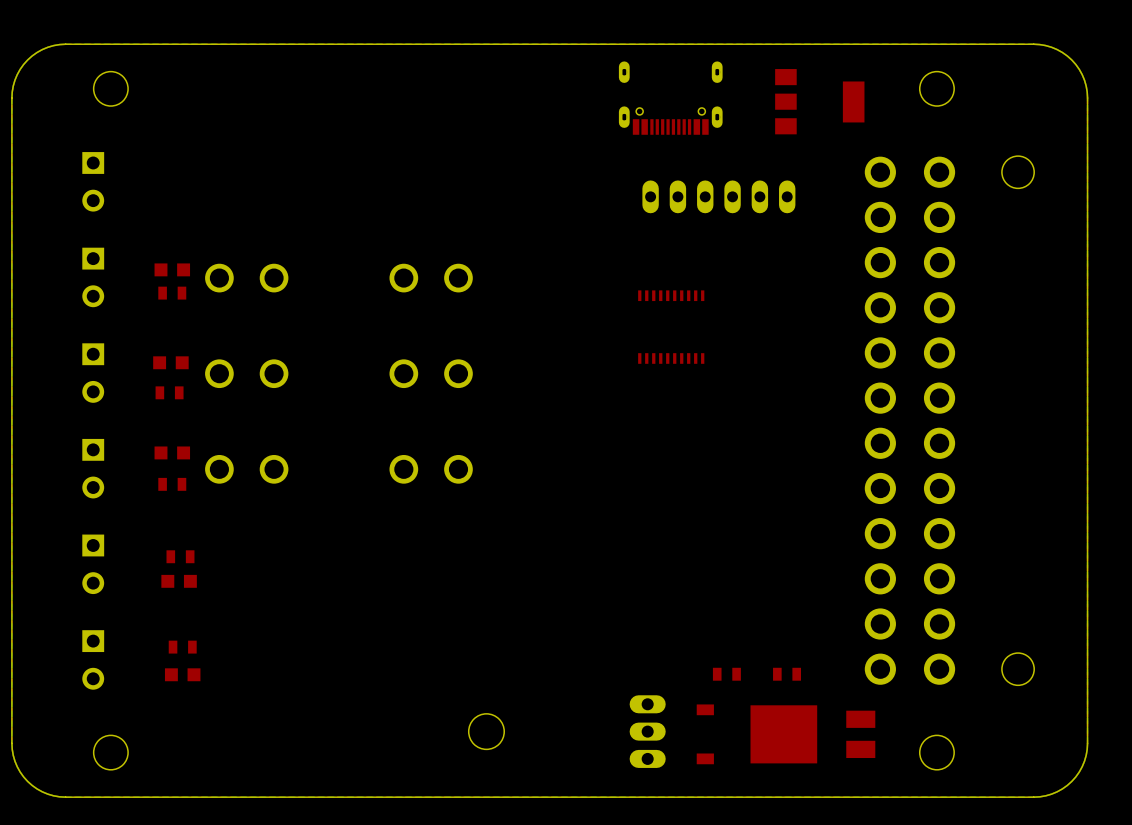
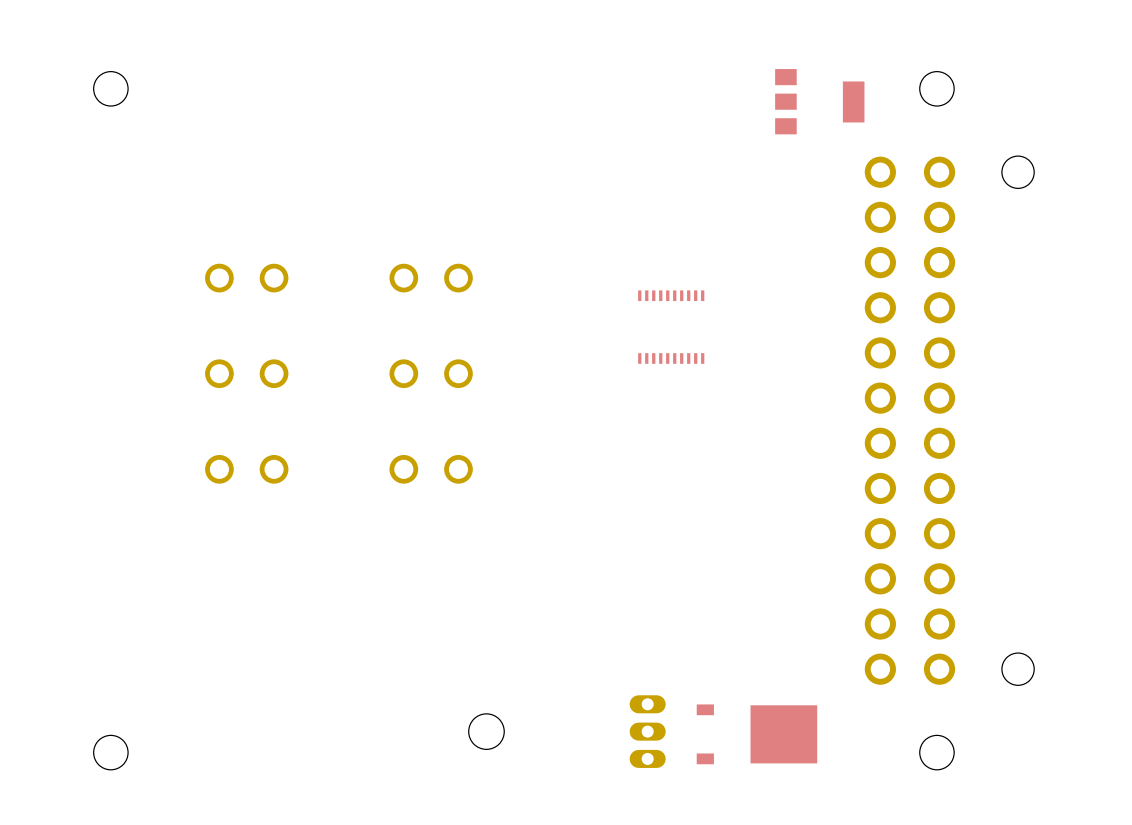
board edge: (1033, 44) (65, 44) (47, 47) (32, 55) (17, 74) (11, 98) (11, 743) (14, 761) (23, 776) (42, 791) (65, 797) (1033, 797) (1051, 794) (1067, 785) (1082, 766) (1087, 743) (1087, 98) (1084, 80) (1071, 59) (1051, 47) (1033, 44) -> none
part: (670, 98) -> none
part: (93, 181) -> none
part: (718, 196) -> none
part: (172, 269) -> none
part: (93, 277) -> none
part: (172, 293) -> none
part: (170, 362) -> none
part: (93, 373) -> none
part: (169, 392) -> none
part: (172, 452) -> none
part: (93, 468) -> none
part: (172, 484) -> none
part: (180, 556) -> none
part: (93, 564) -> none
part: (179, 581) -> none
part: (182, 647) -> none
part: (93, 659) -> none
part: (182, 674) -> none
part: (726, 674) -> none
part: (787, 674) -> none
part: (860, 734) -> none

